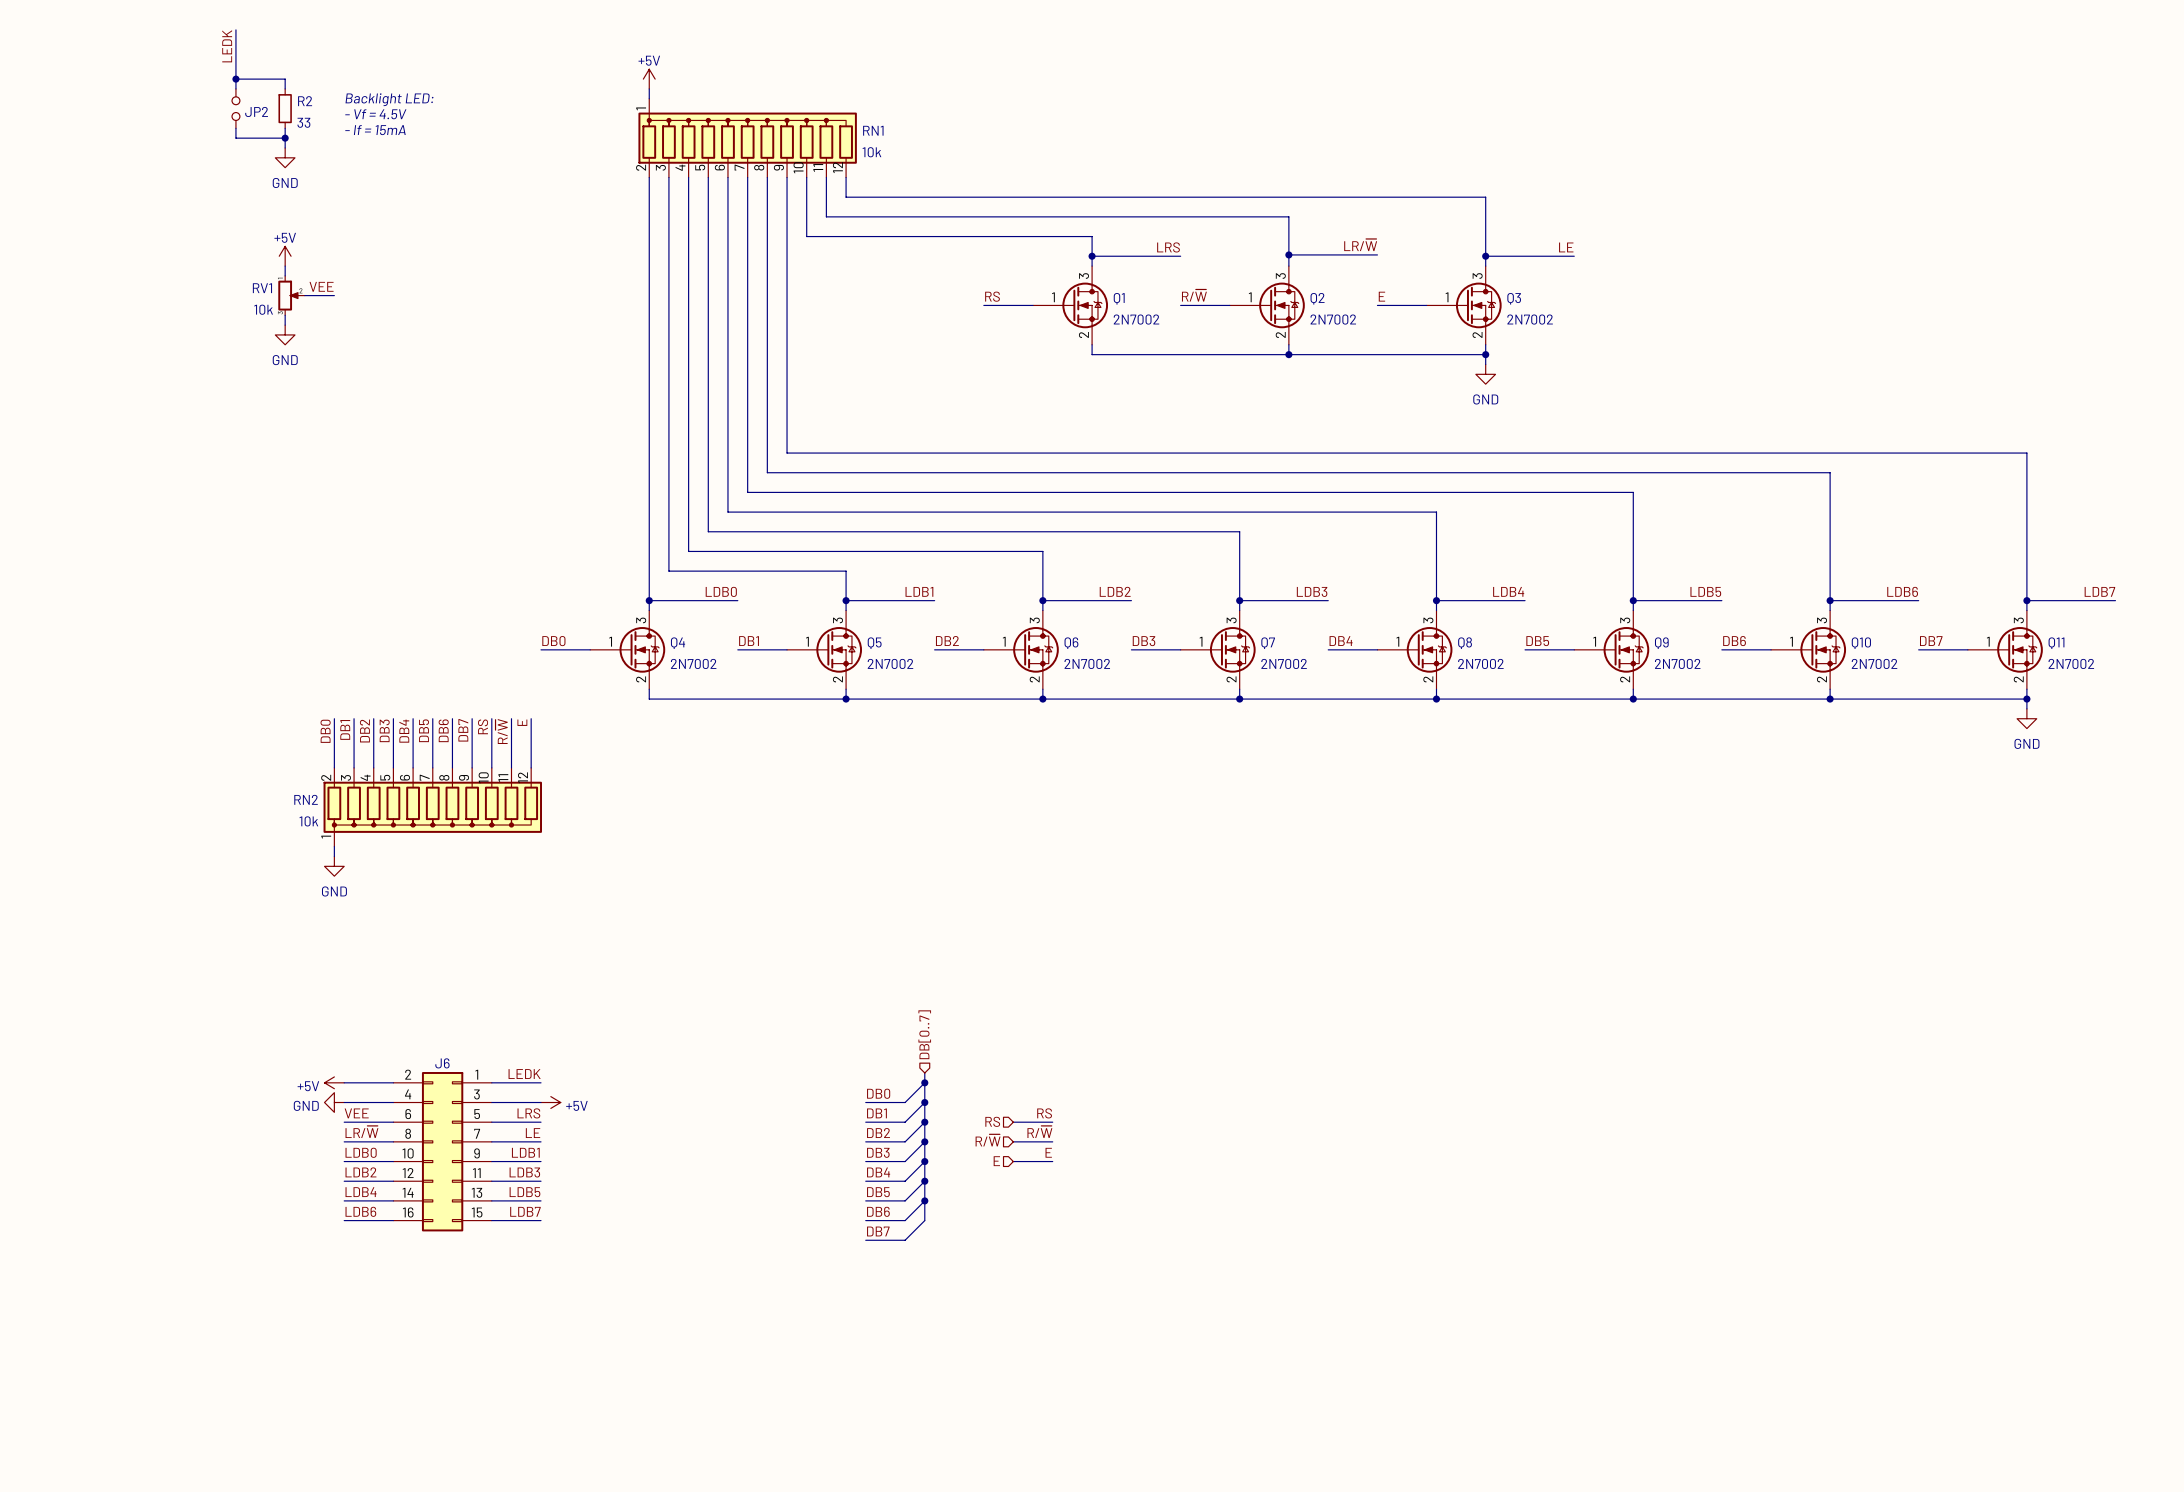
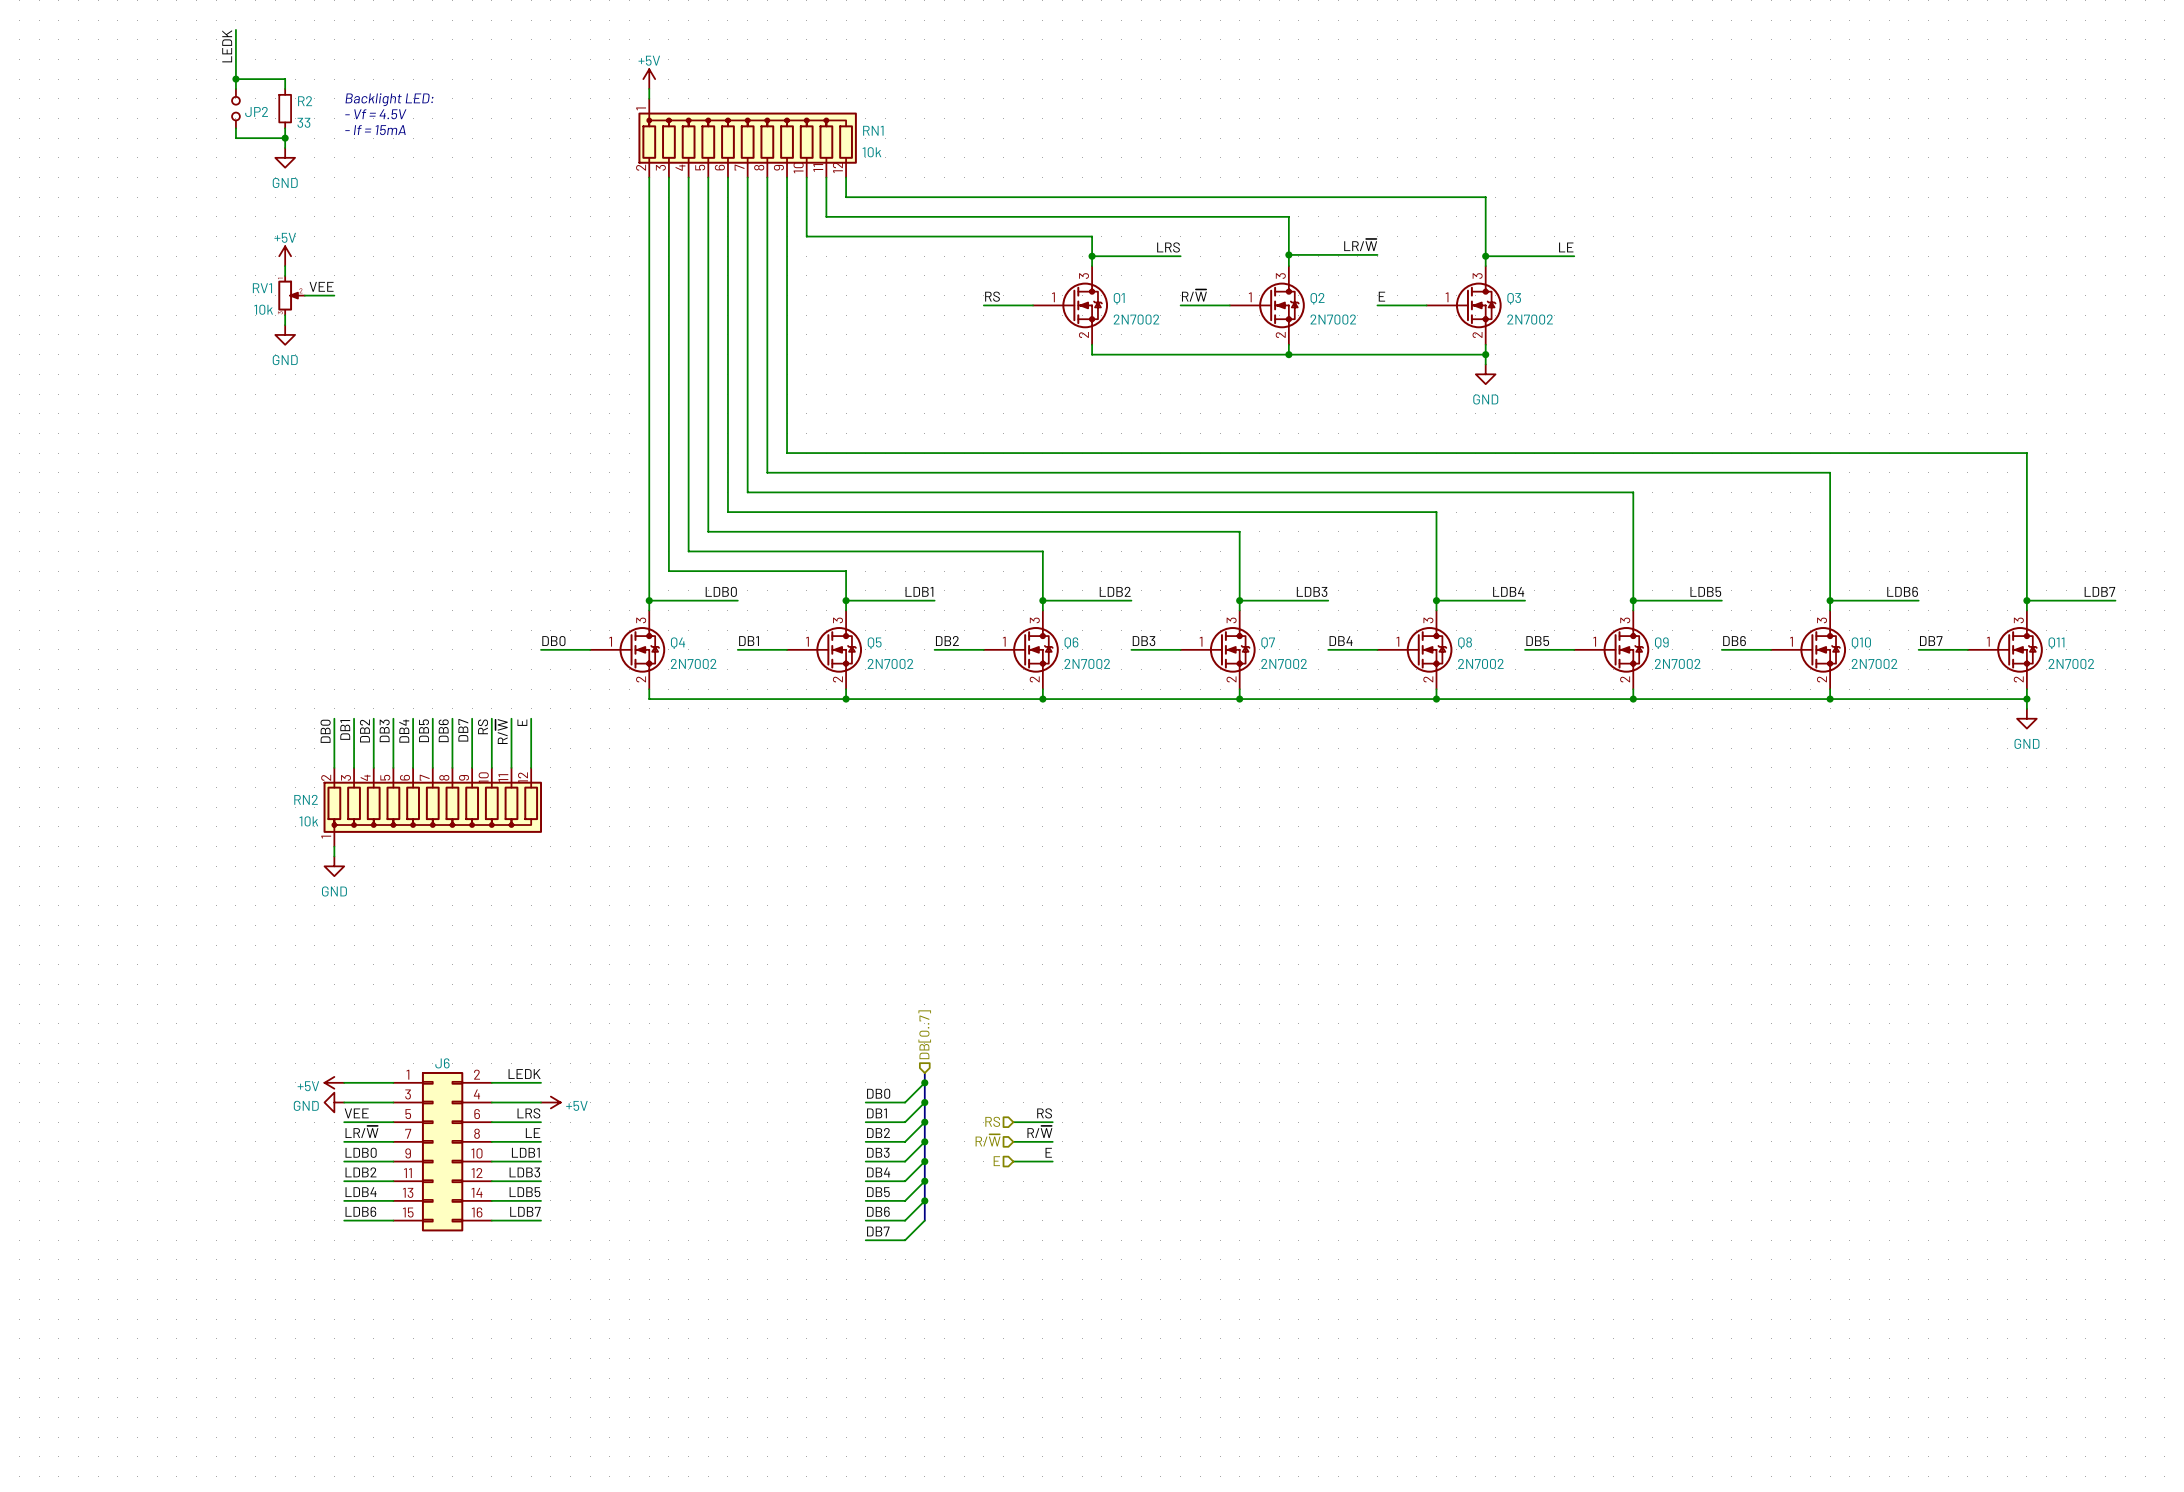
J6 flip: as is (442, 1151) -> left-right (442, 1151)

